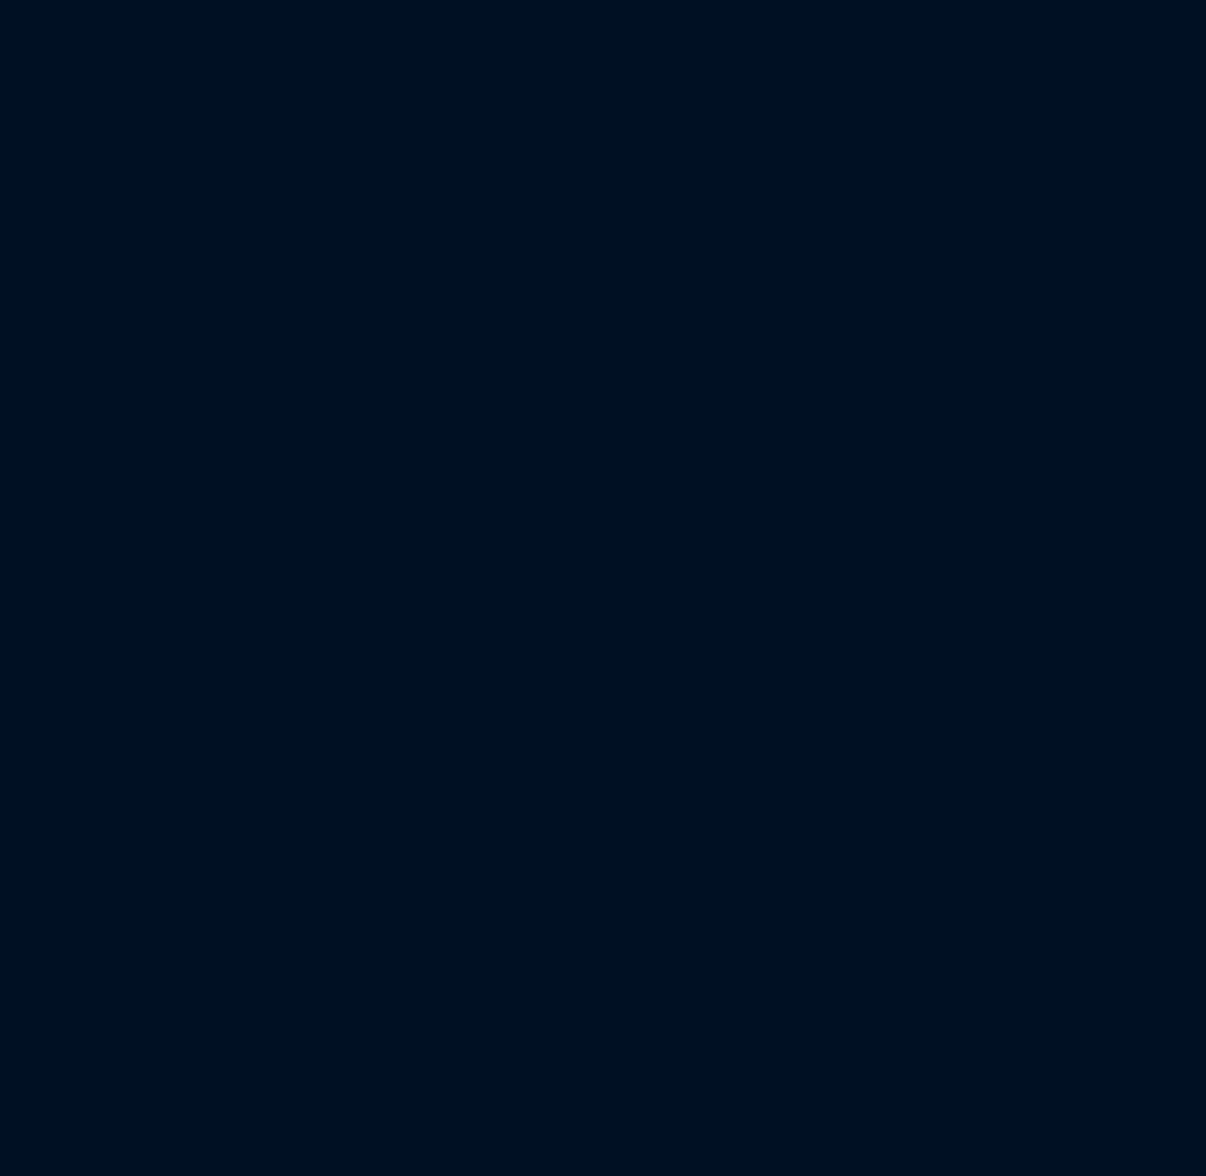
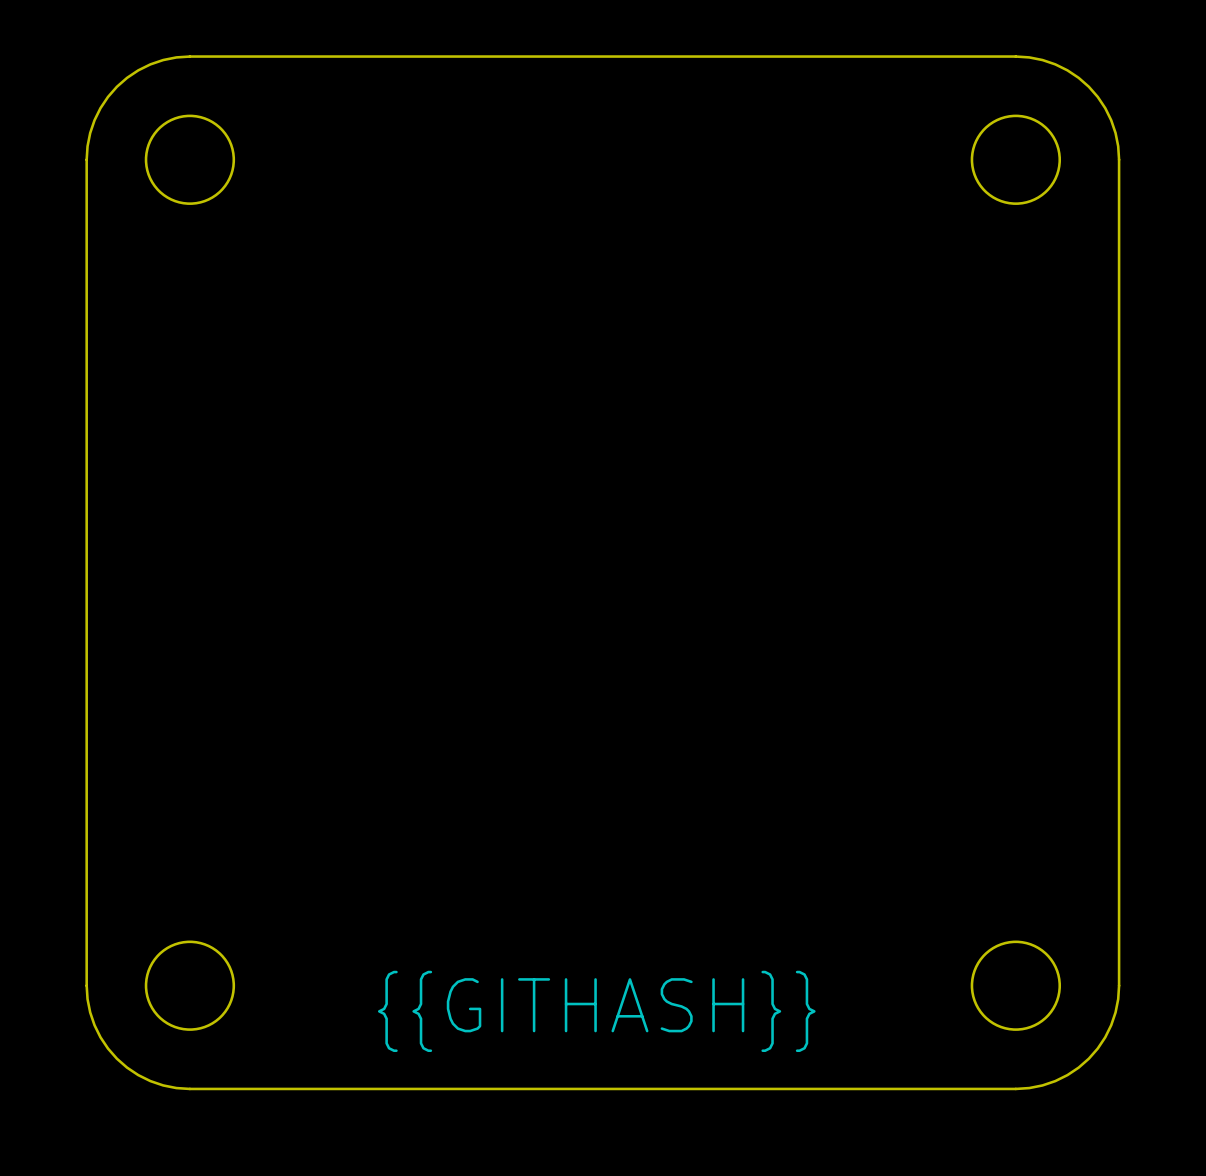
board edge: none -> (189, 56) (1015, 56) (1042, 60) (1055, 64) (1078, 77) (1088, 86) (1097, 96) (1111, 120) (1115, 133) (1119, 159) (1119, 985) (1118, 999) (1111, 1025) (1097, 1048) (1088, 1058) (1078, 1067) (1055, 1081) (1042, 1085) (1015, 1088) (189, 1088) (176, 1088) (150, 1081) (127, 1067) (116, 1058) (100, 1037) (94, 1025) (87, 999) (86, 985) (87, 146) (94, 120) (100, 108) (116, 86) (127, 77) (150, 64) (163, 60) (189, 56)
round board edge: none -> [144, 114, 236, 205]
round board edge: none -> [970, 114, 1062, 205]
round board edge: none -> [144, 940, 236, 1031]
round board edge: none -> [970, 940, 1062, 1031]
text: none -> {{GITHASH}} (596, 1011)

